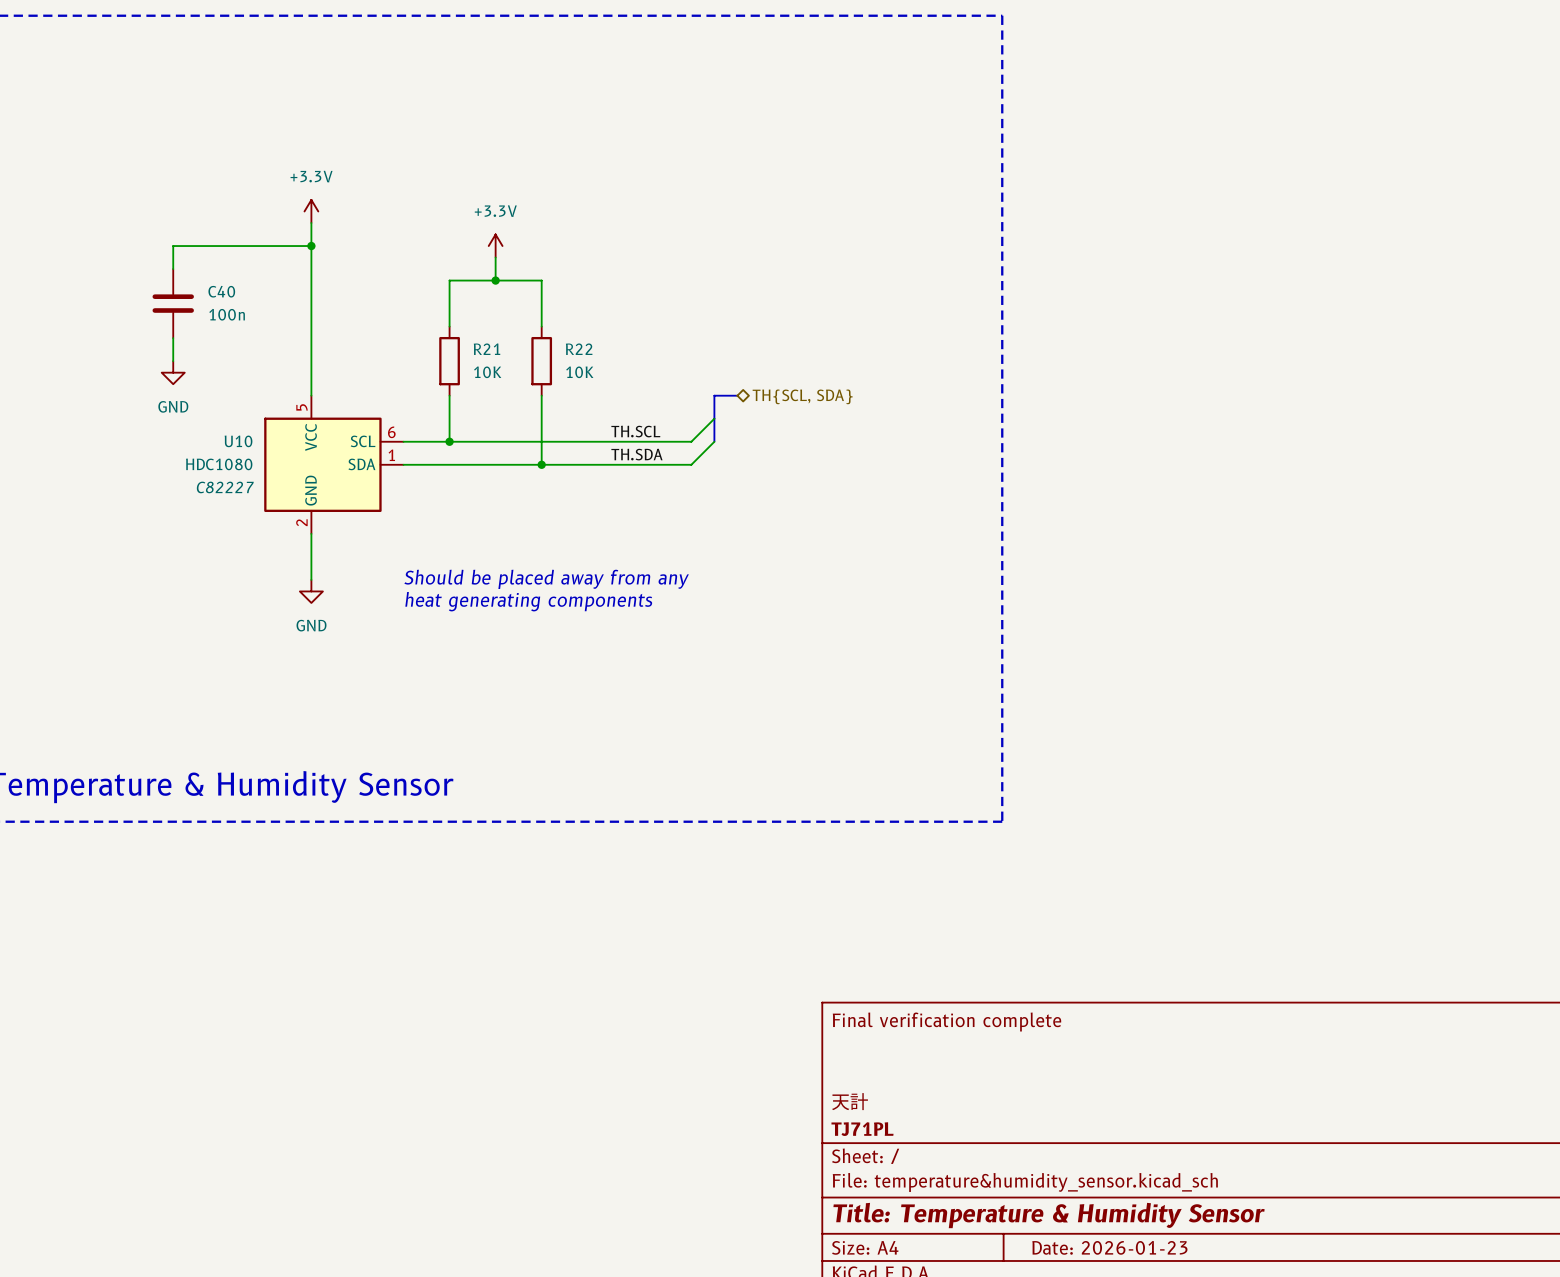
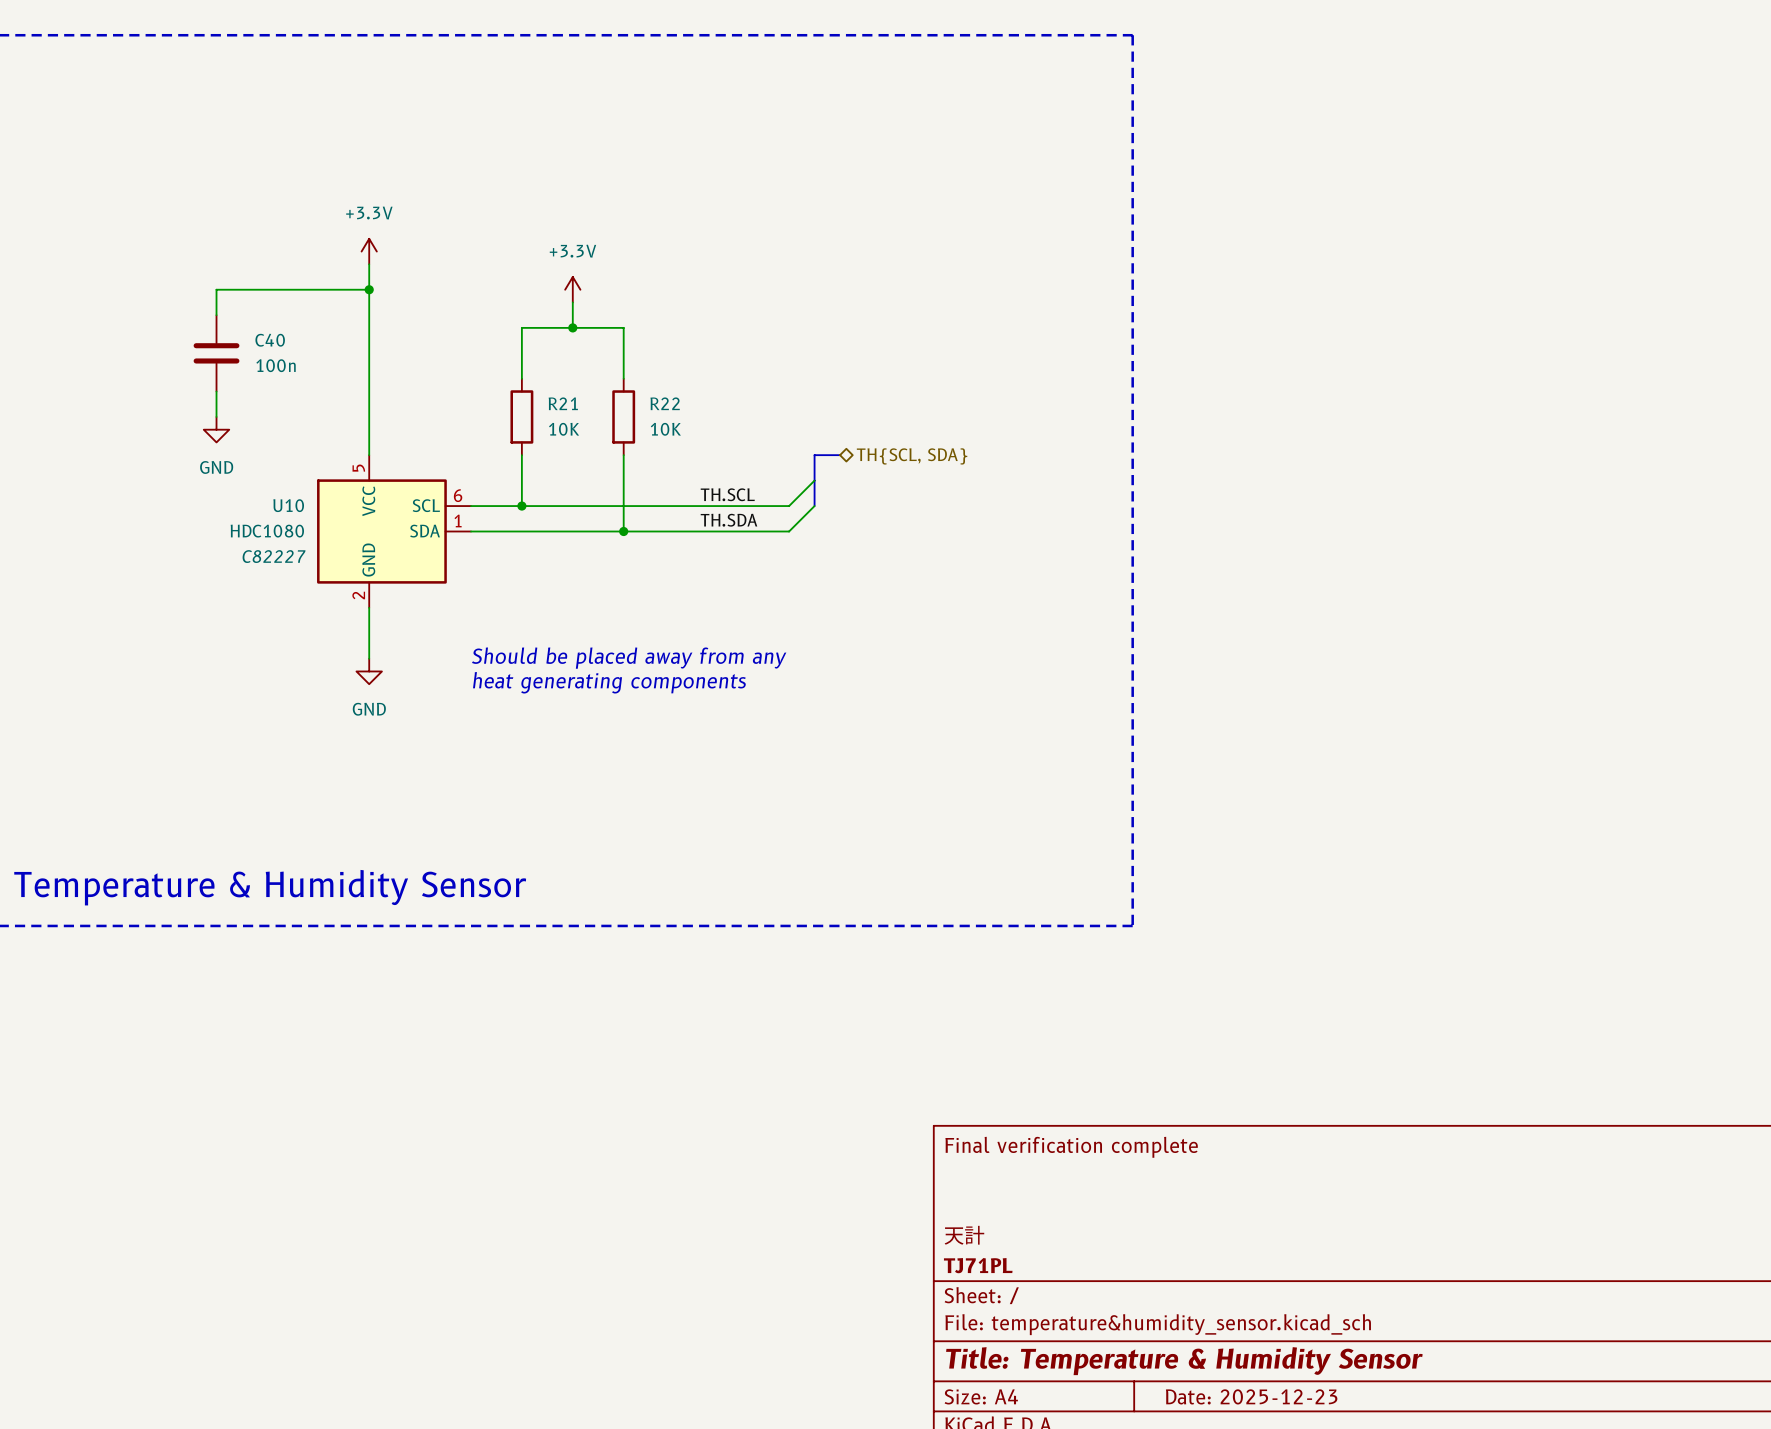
title block: Date: 2026-01-23 (1109, 1247) -> Date: 2025-12-23 (1251, 1396)

